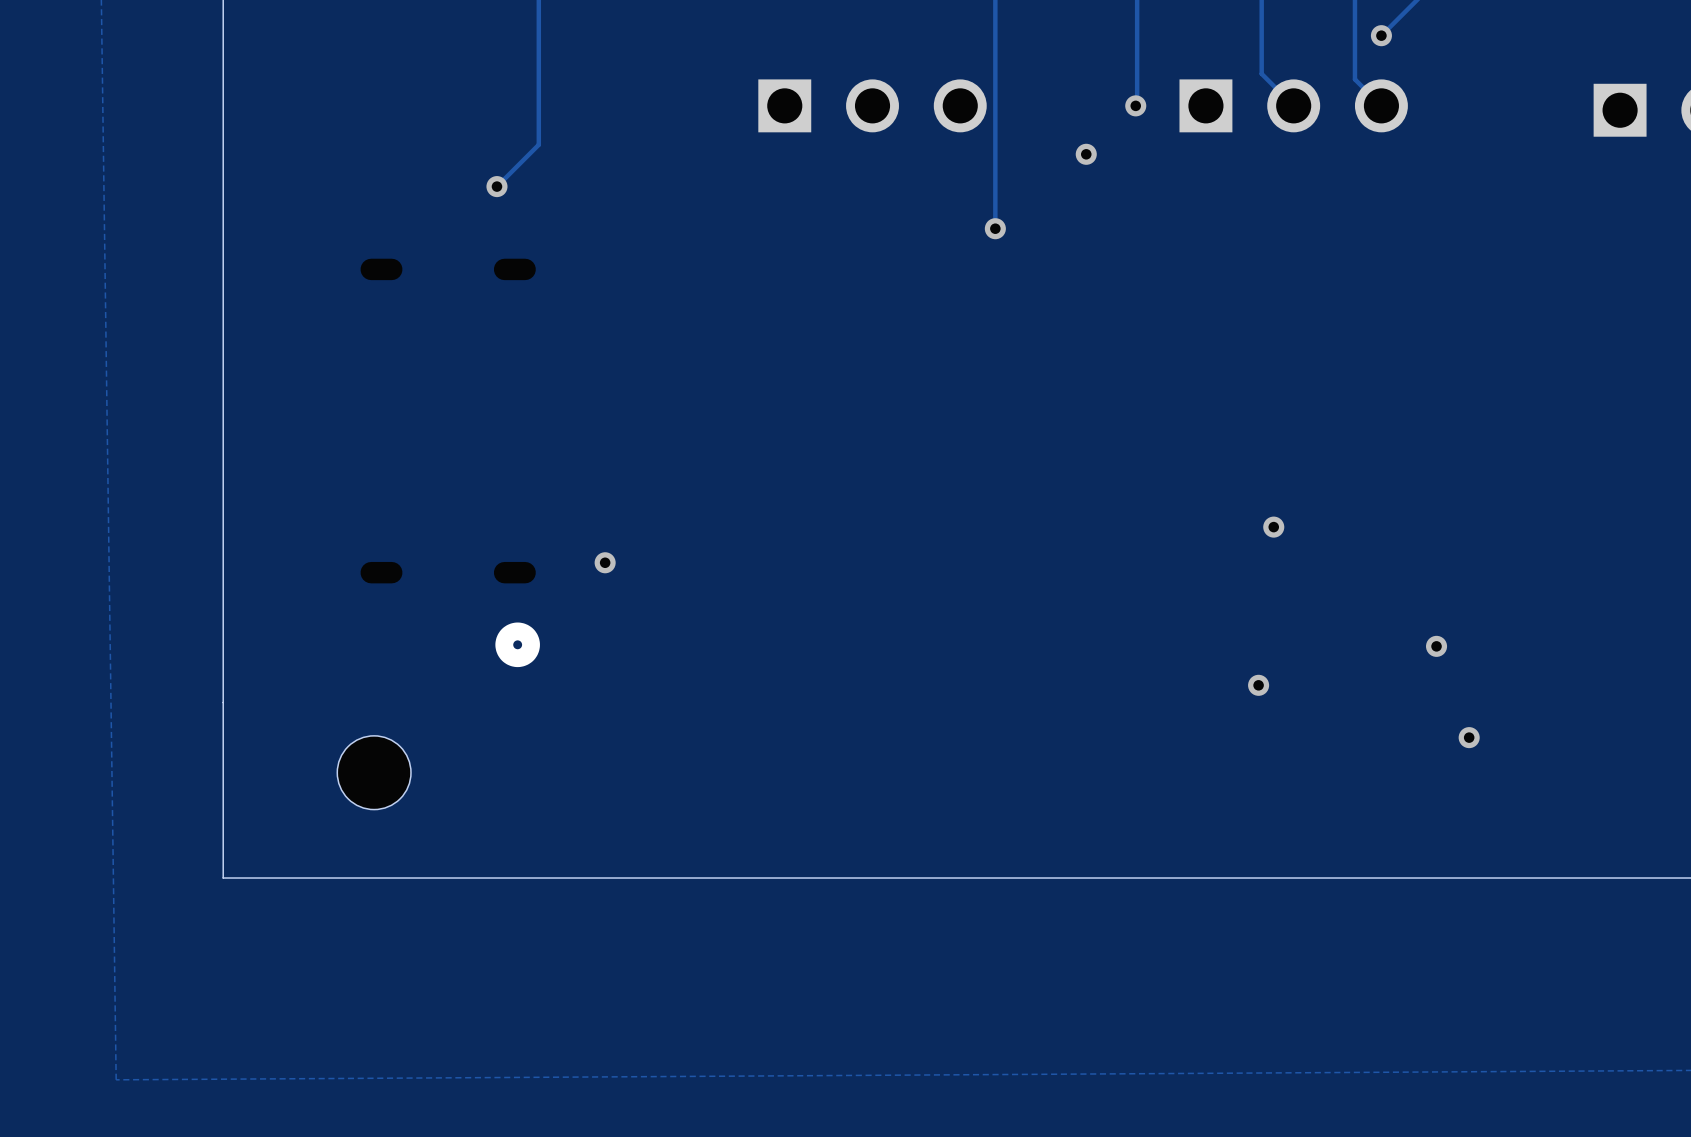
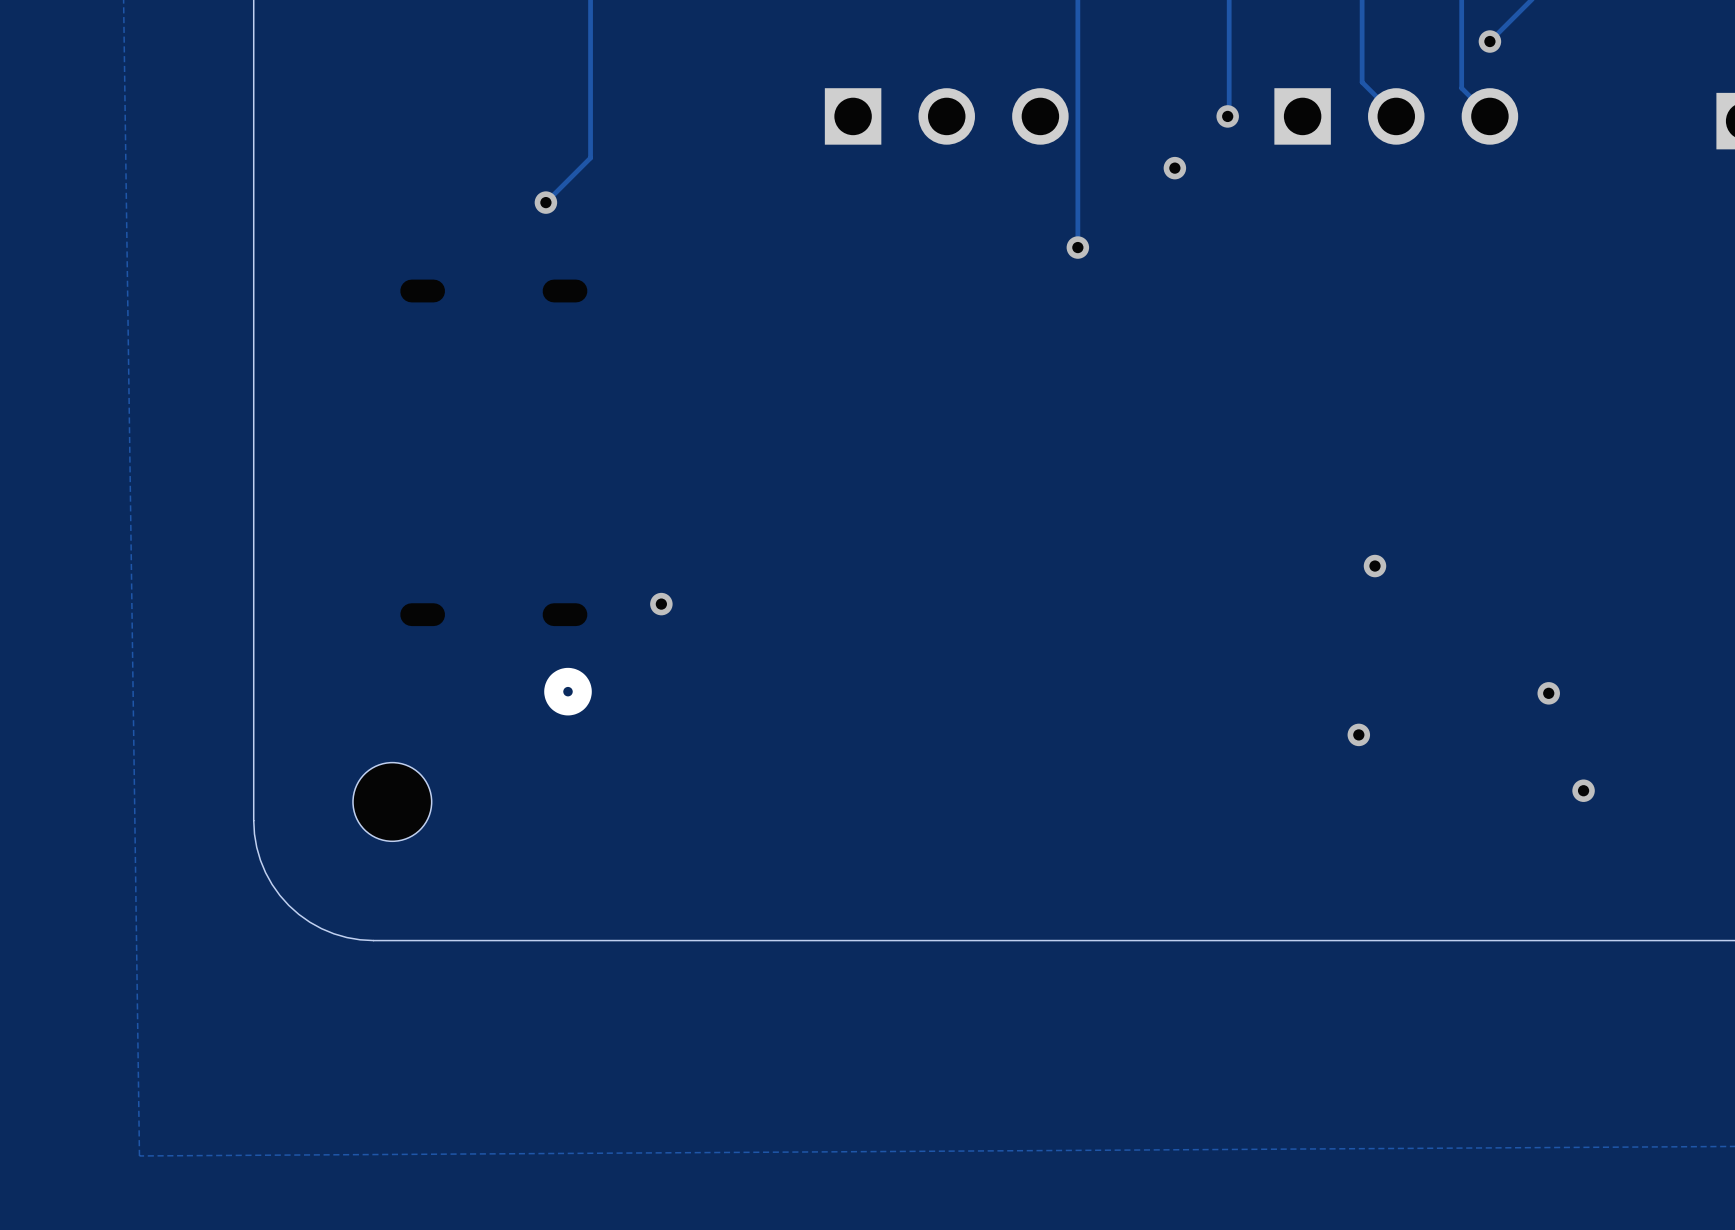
board edge: (223, 765) (223, 878) (335, 878) -> (253, 820) (256, 847) (265, 872) (279, 895) (288, 905) (309, 922) (321, 928) (346, 937) (373, 940)
part position: (374, 772) -> (392, 801)

